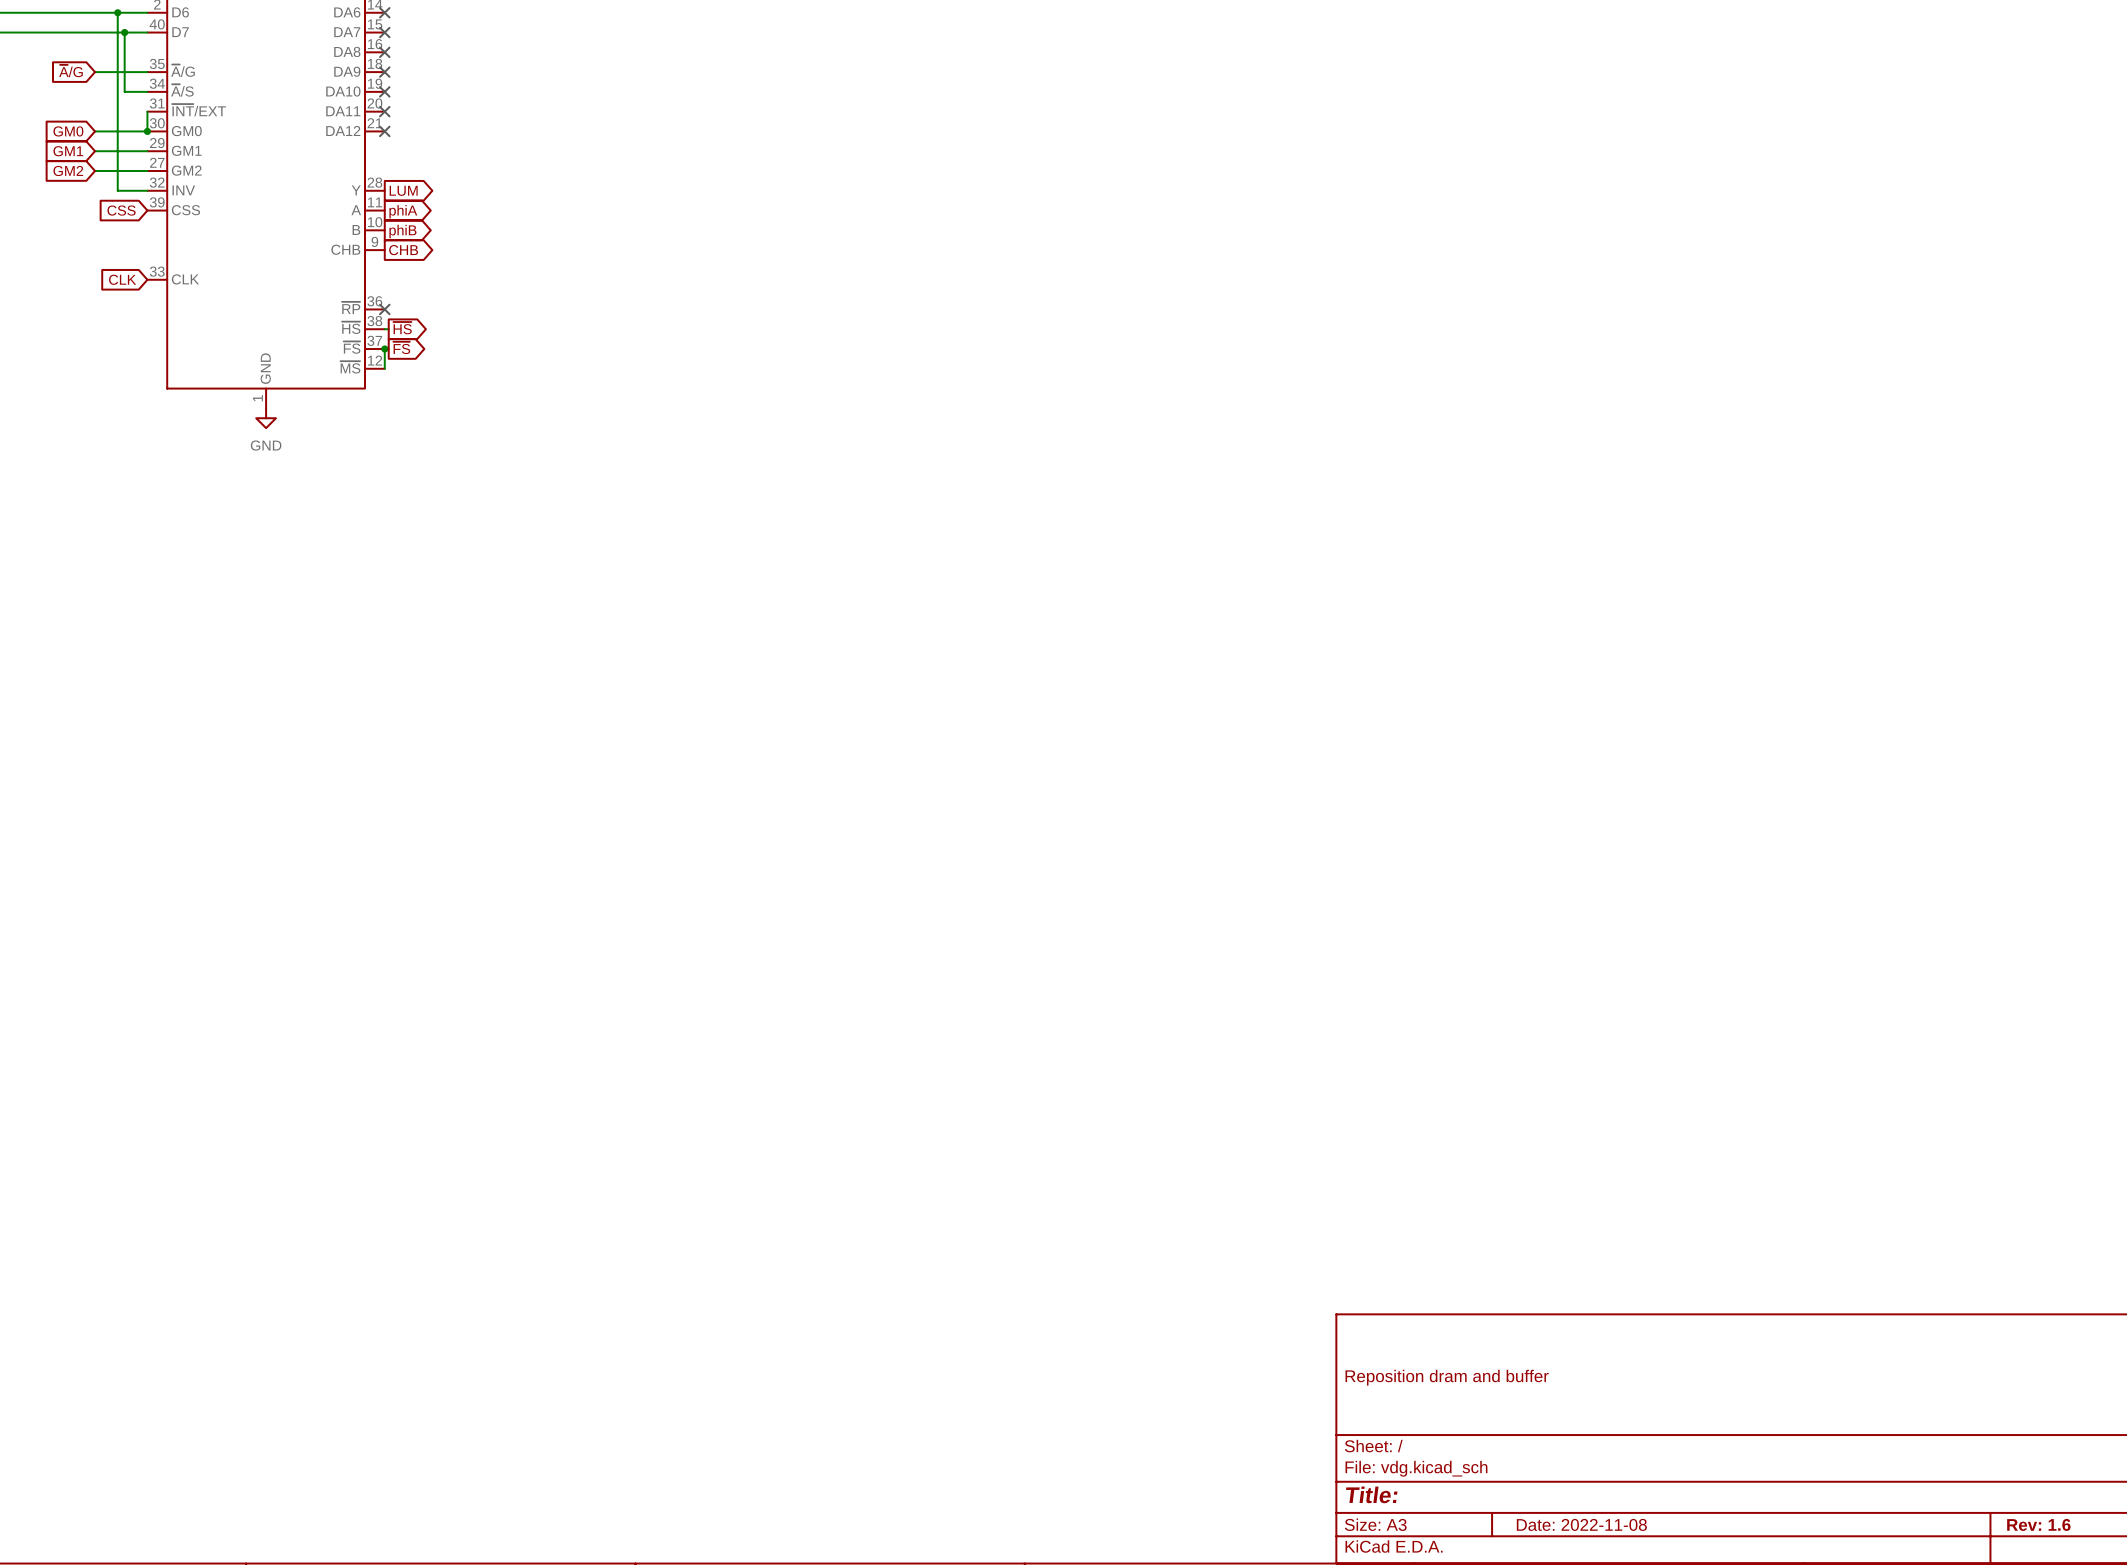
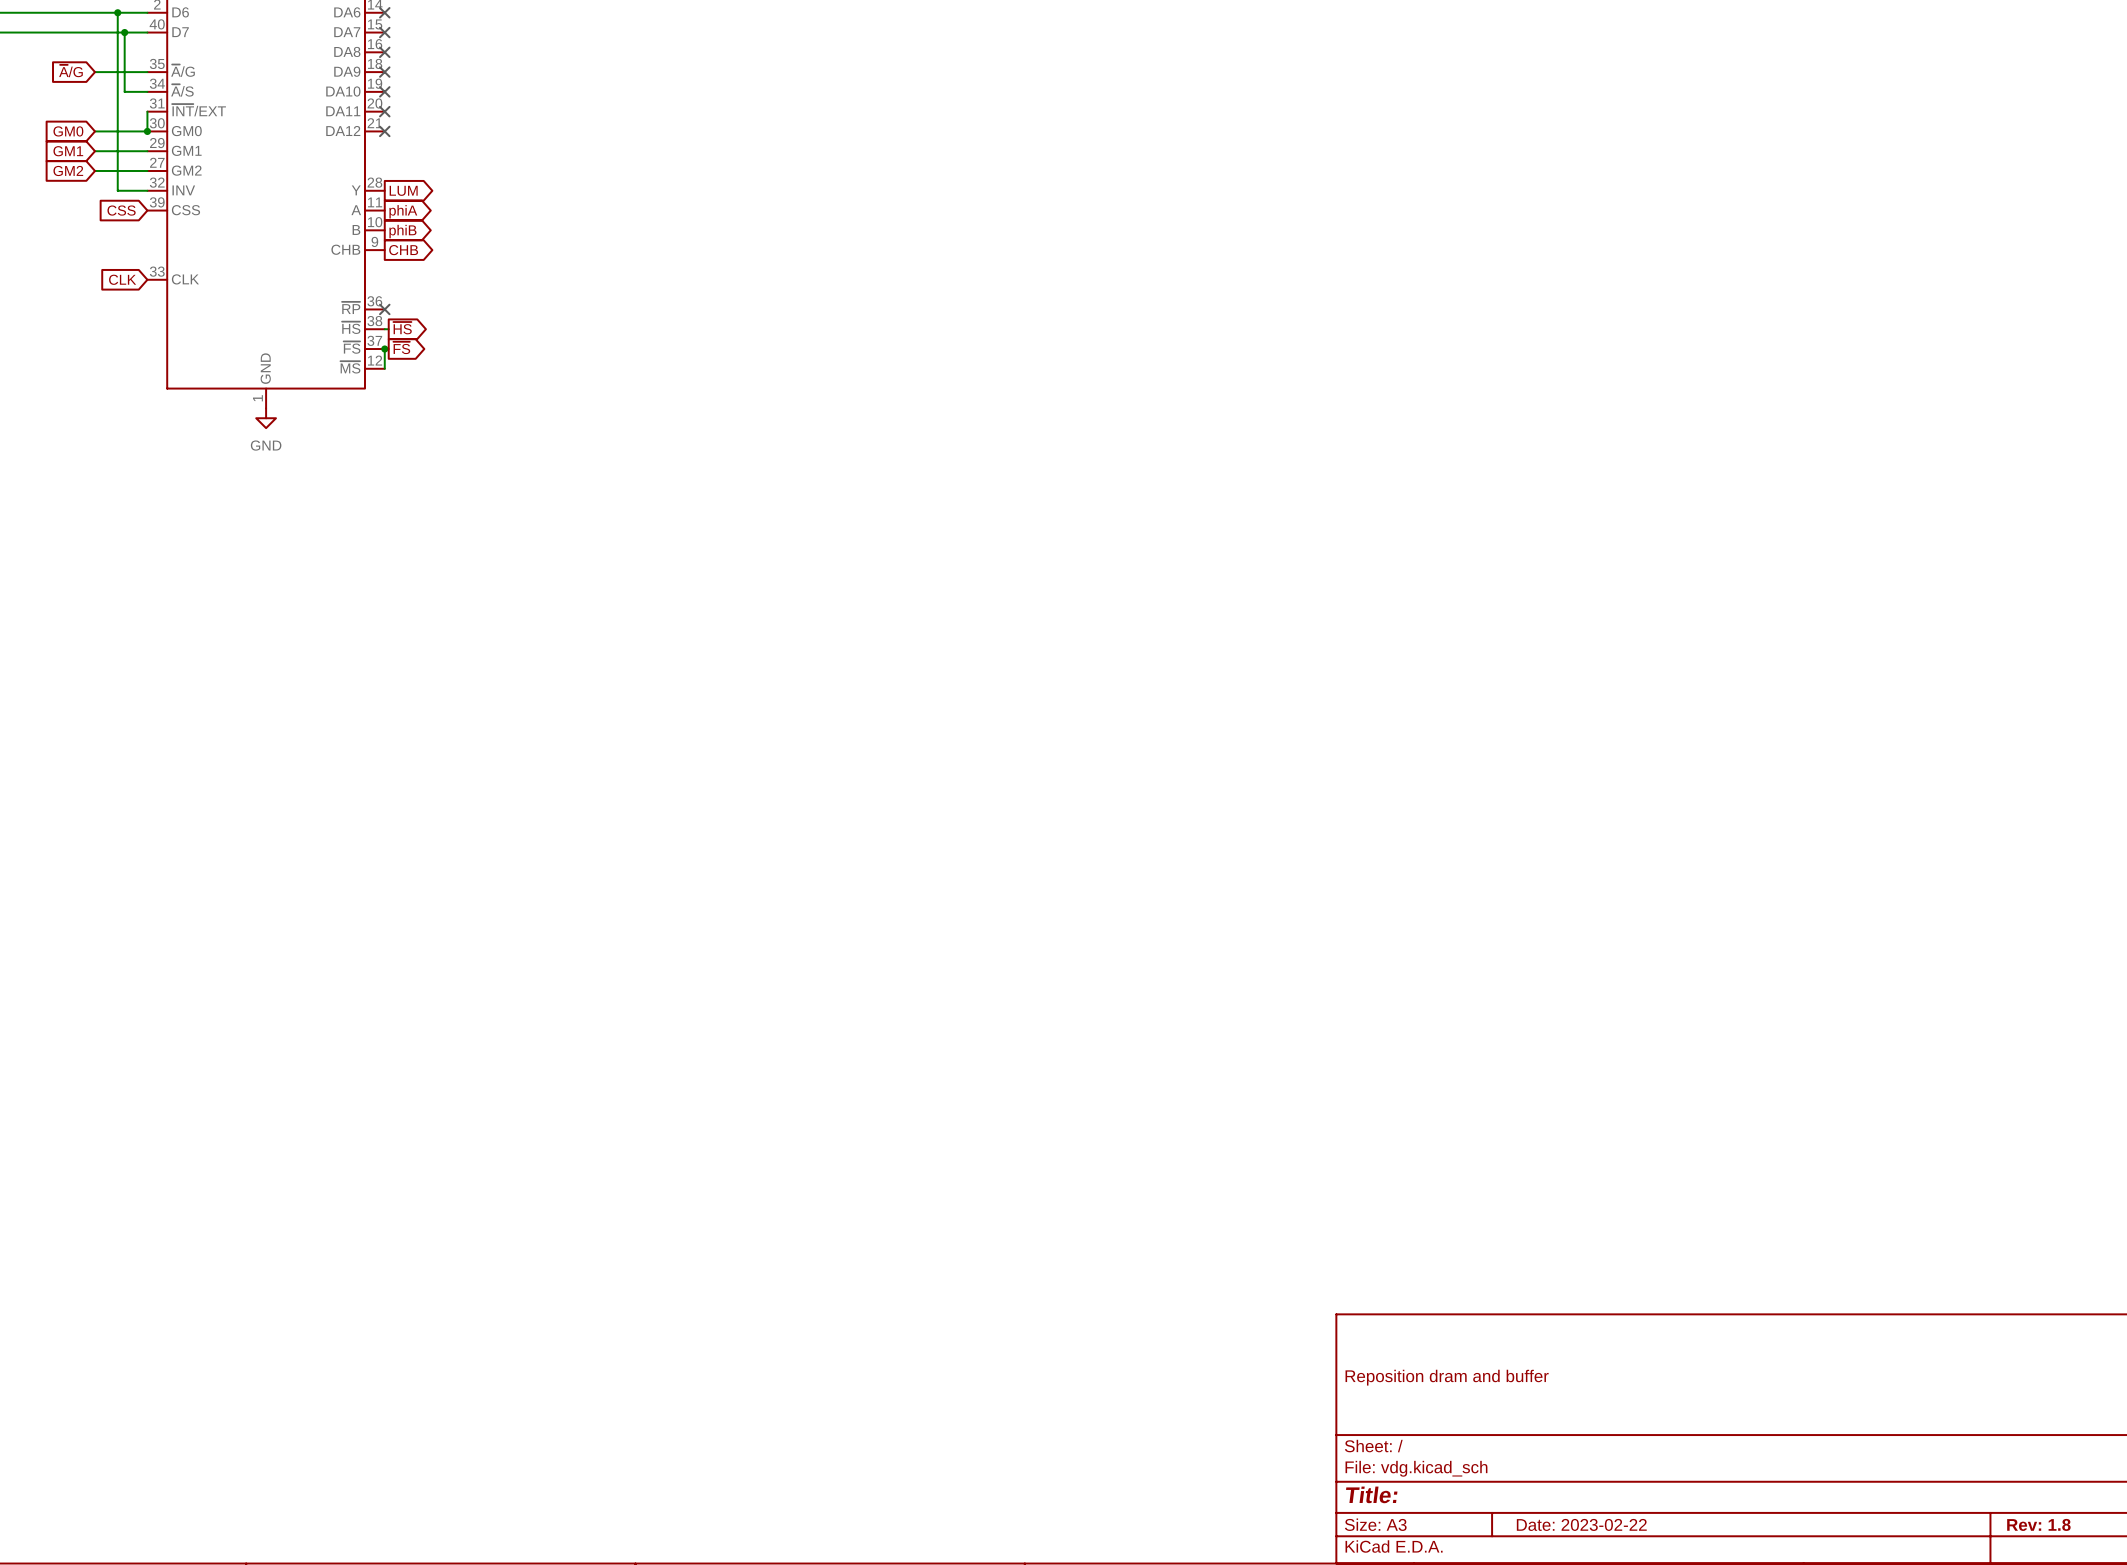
title block: Date: 2022-11-08 (1581, 1524) -> Date: 2023-02-22 (1581, 1524)
title block: Rev: 1.6 (2038, 1524) -> Rev: 1.8 (2038, 1524)

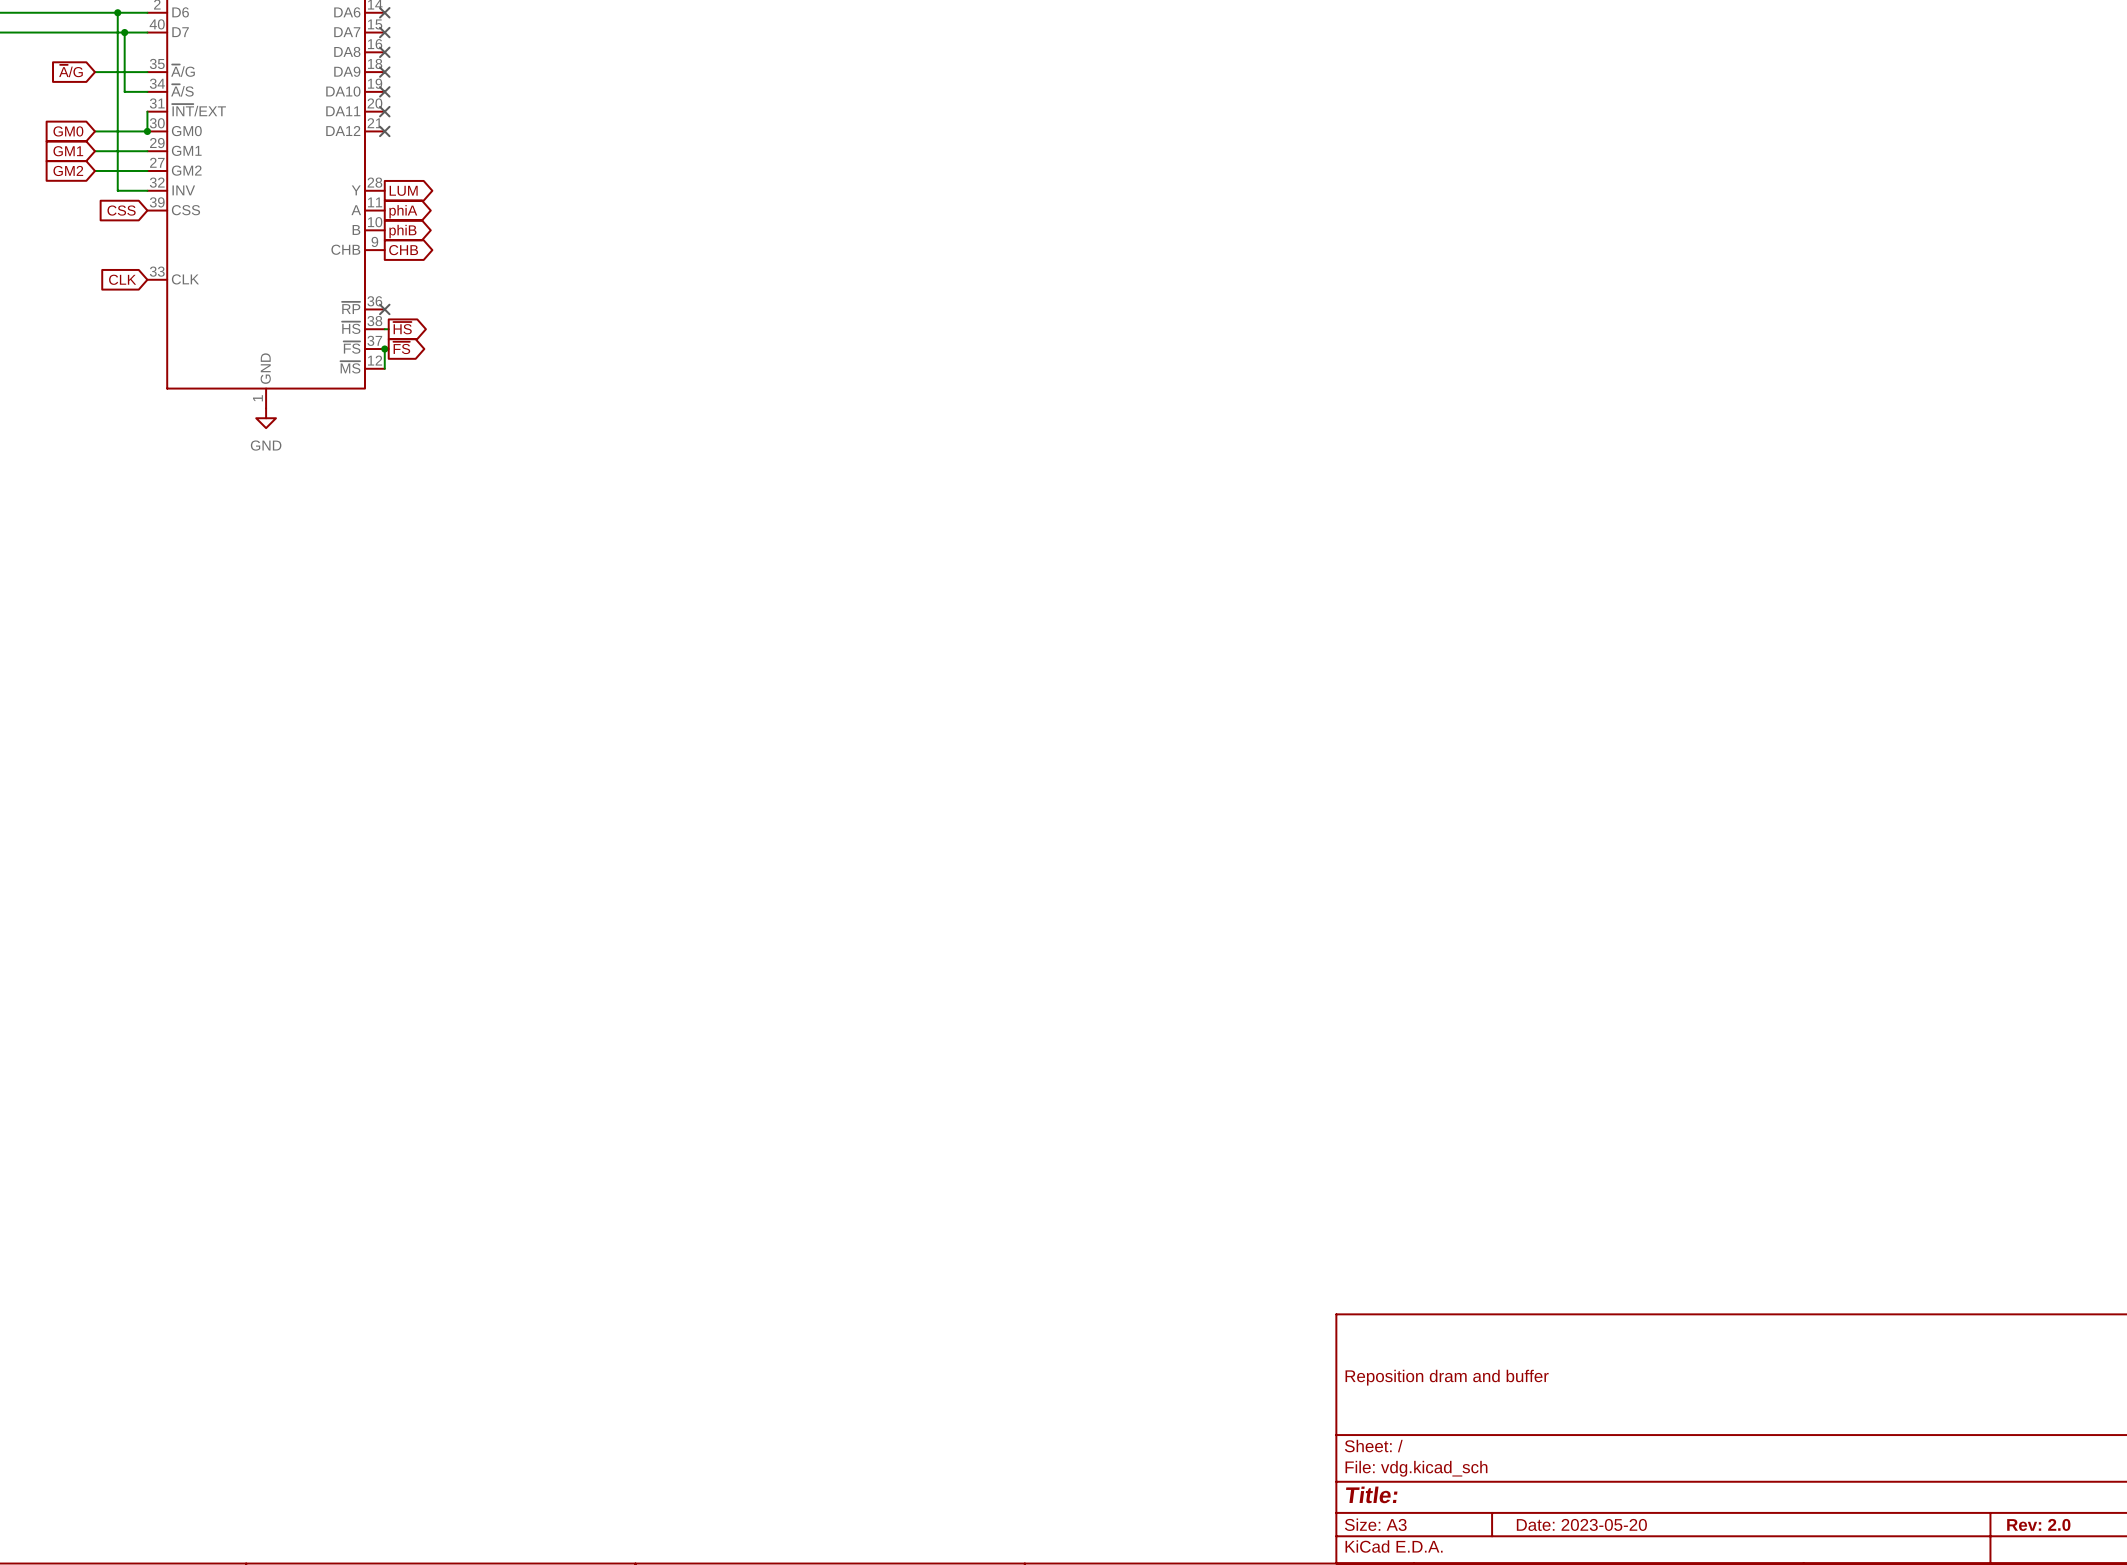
title block: Date: 2023-02-22 (1581, 1524) -> Date: 2023-05-20 (1581, 1524)
title block: Rev: 1.8 (2038, 1524) -> Rev: 2.0 (2038, 1524)

